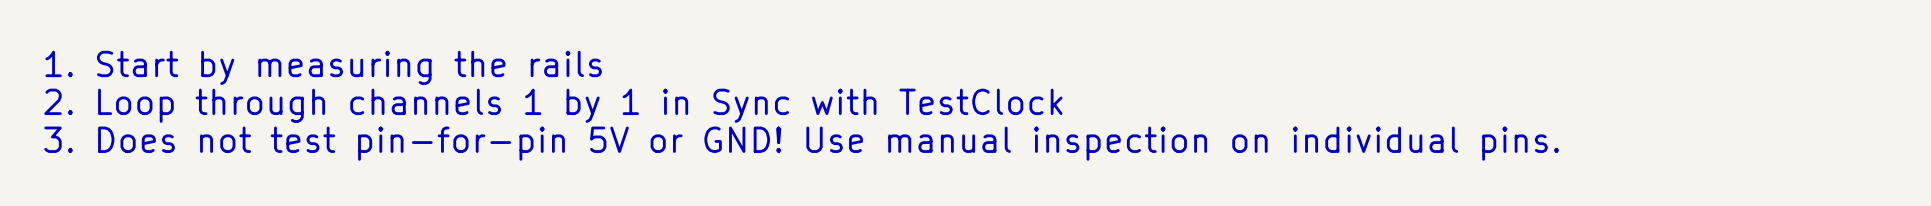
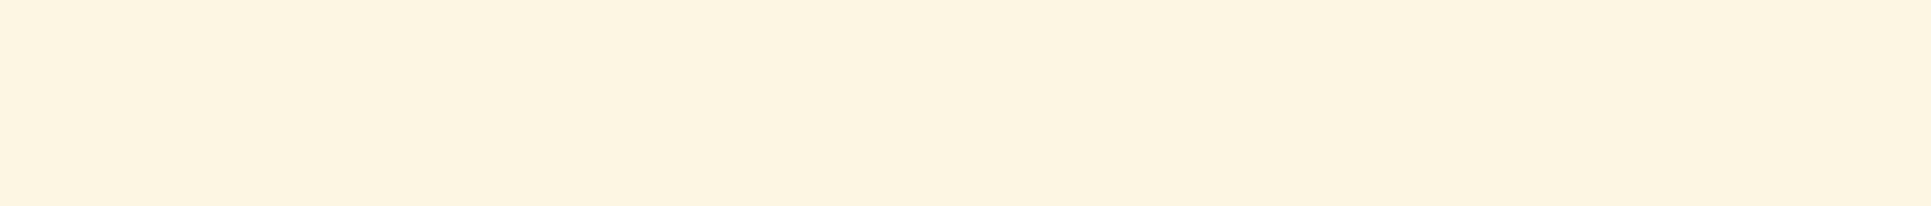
text: 1. Start by measuring the rails (323, 67) -> none
text: 2. Loop through channels 1 by 1 in Sync with TestClock (553, 105) -> none
text: 3. Does not test pin-for-pin 5V or GND! Use manual inspection on individual pins. (801, 143) -> none

